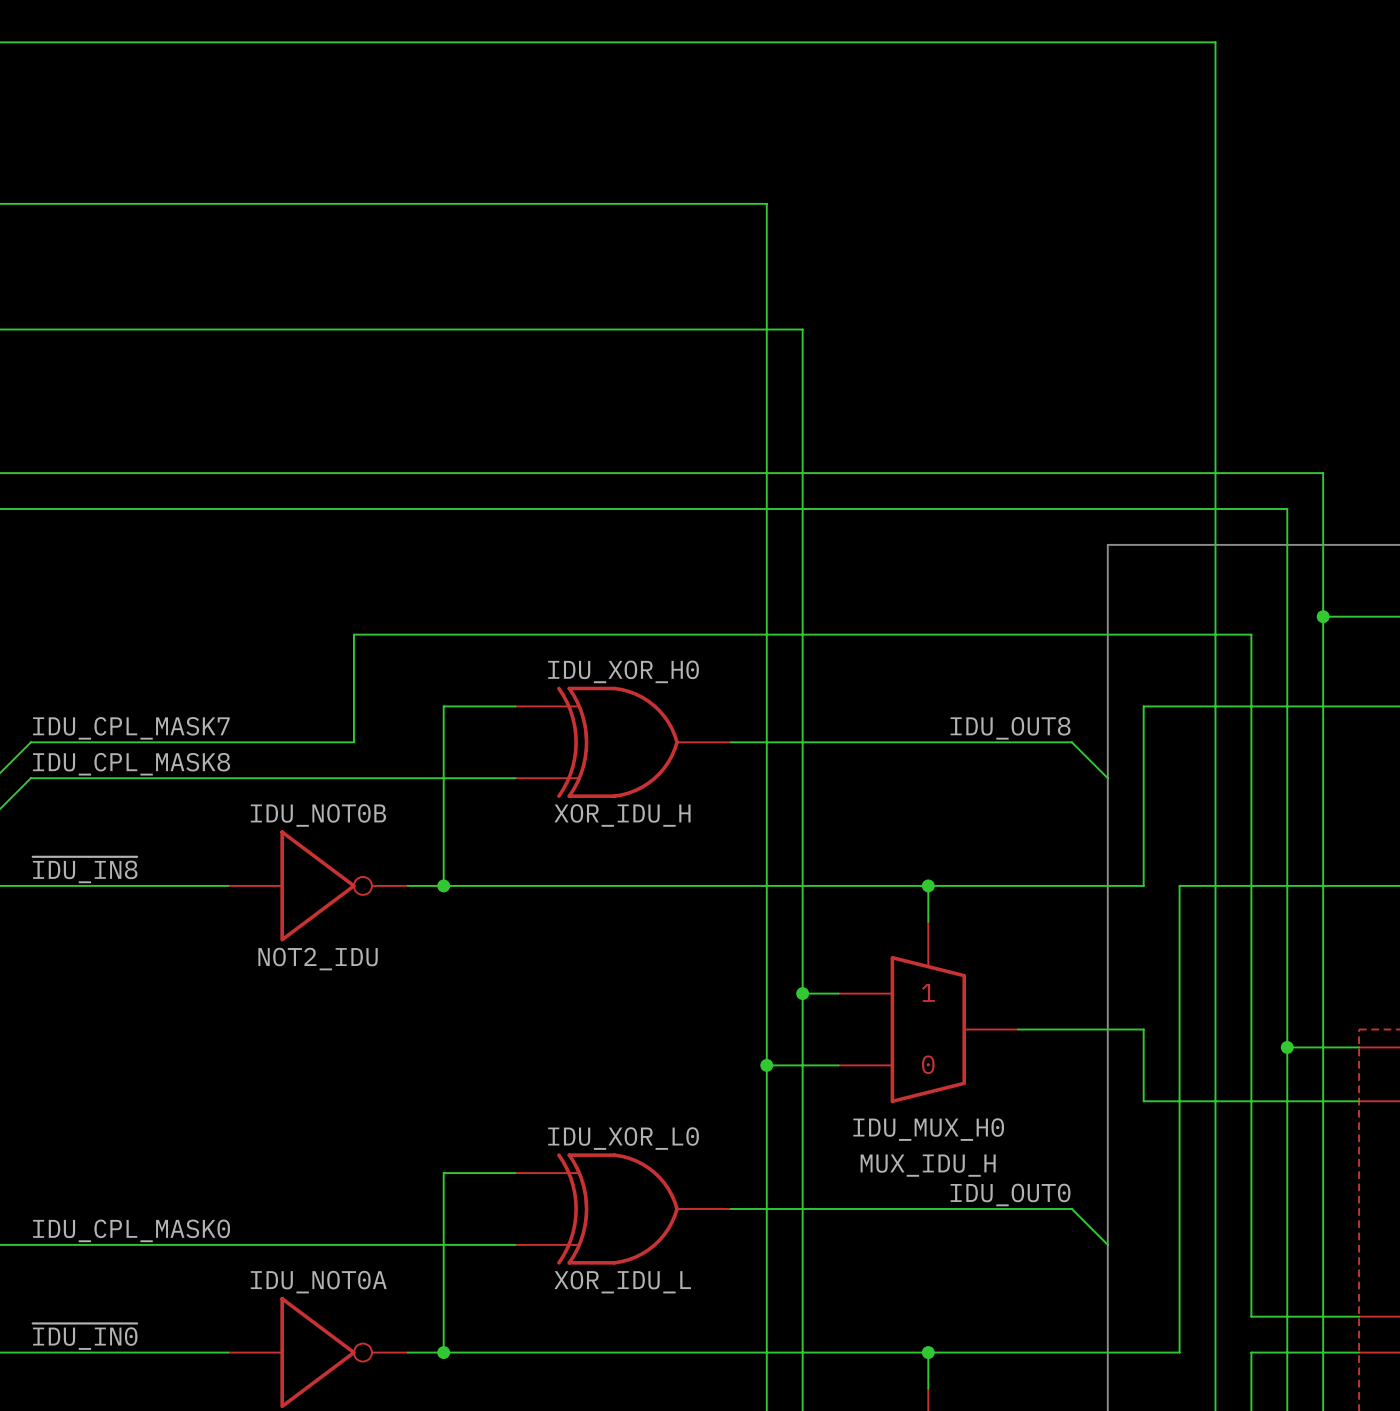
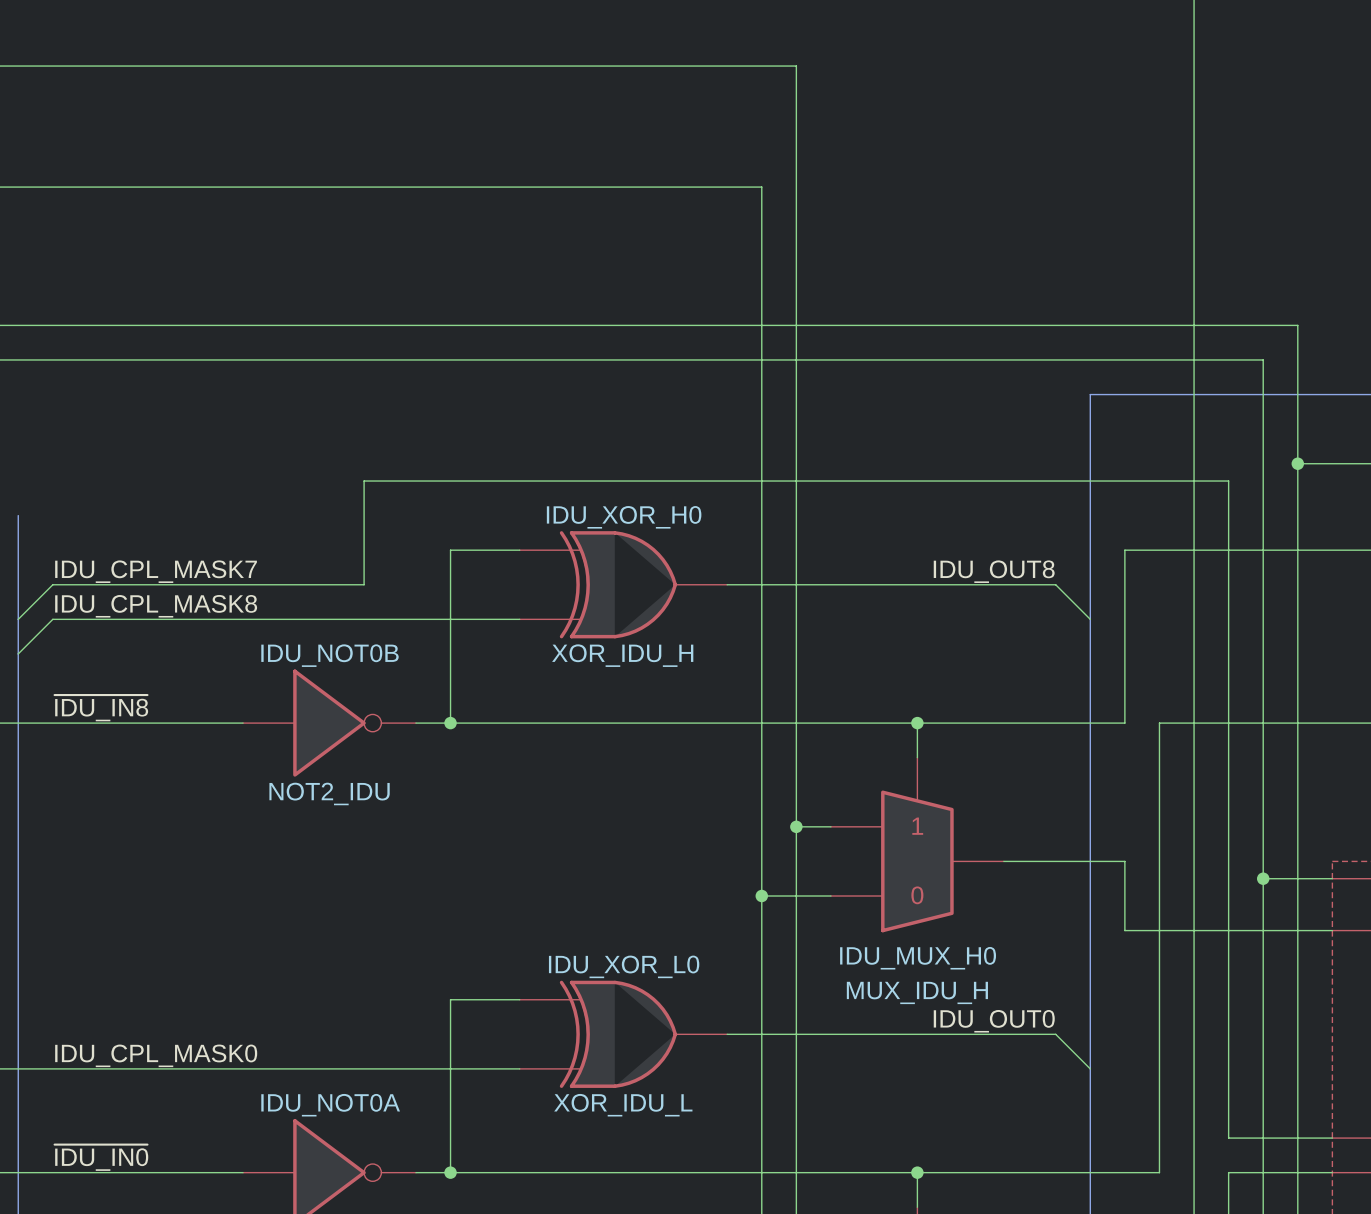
wire: (766, 203) (766, 329) (802, 329) -> (761, 66) (796, 66) (796, 187)

